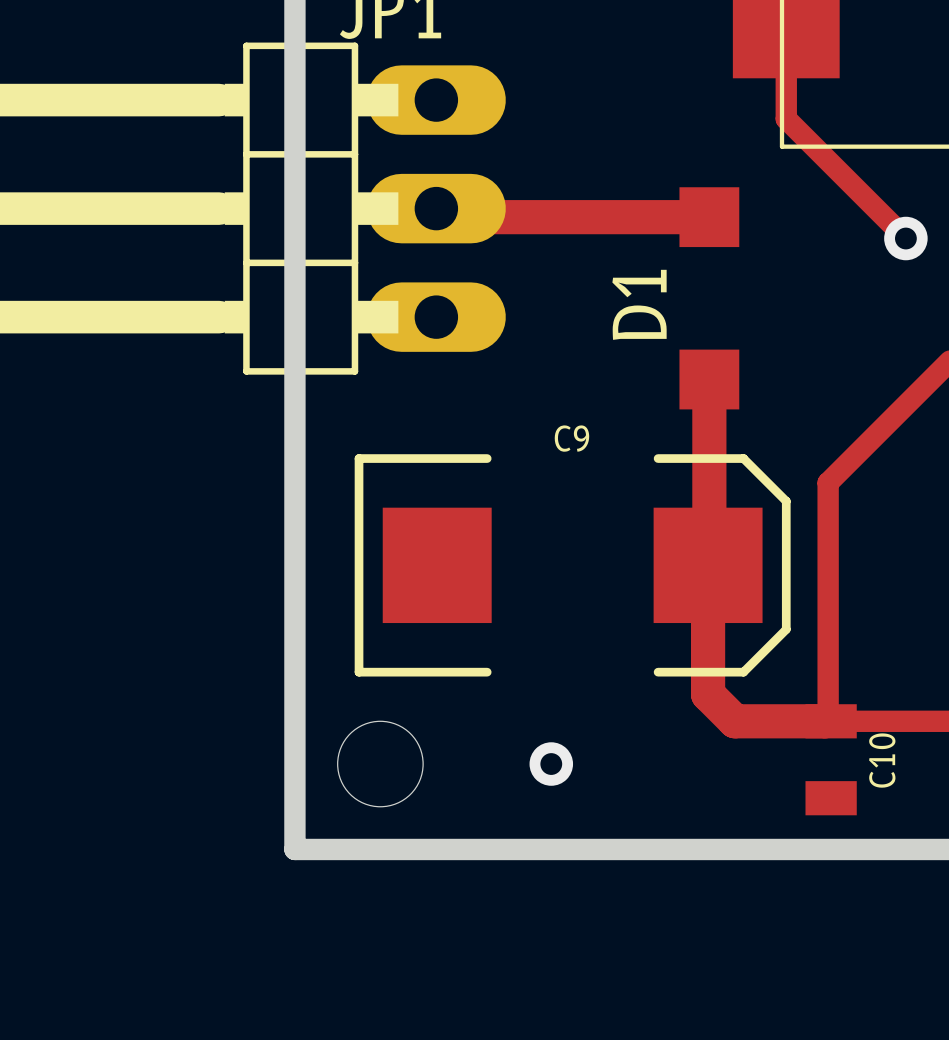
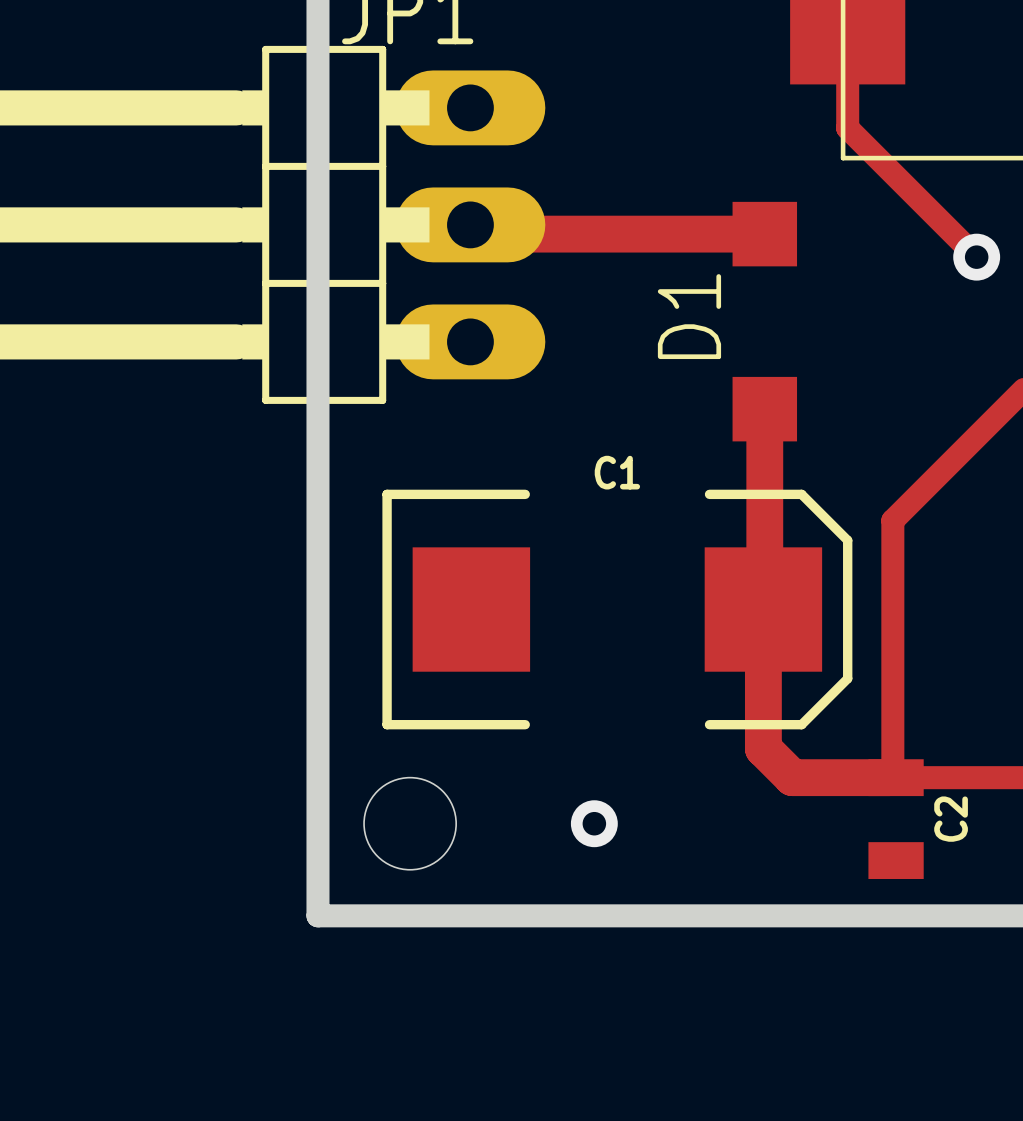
C9 name: C9 (571, 438) -> C1 (617, 472)
C10 name: C10 (882, 760) -> C2 (951, 819)

